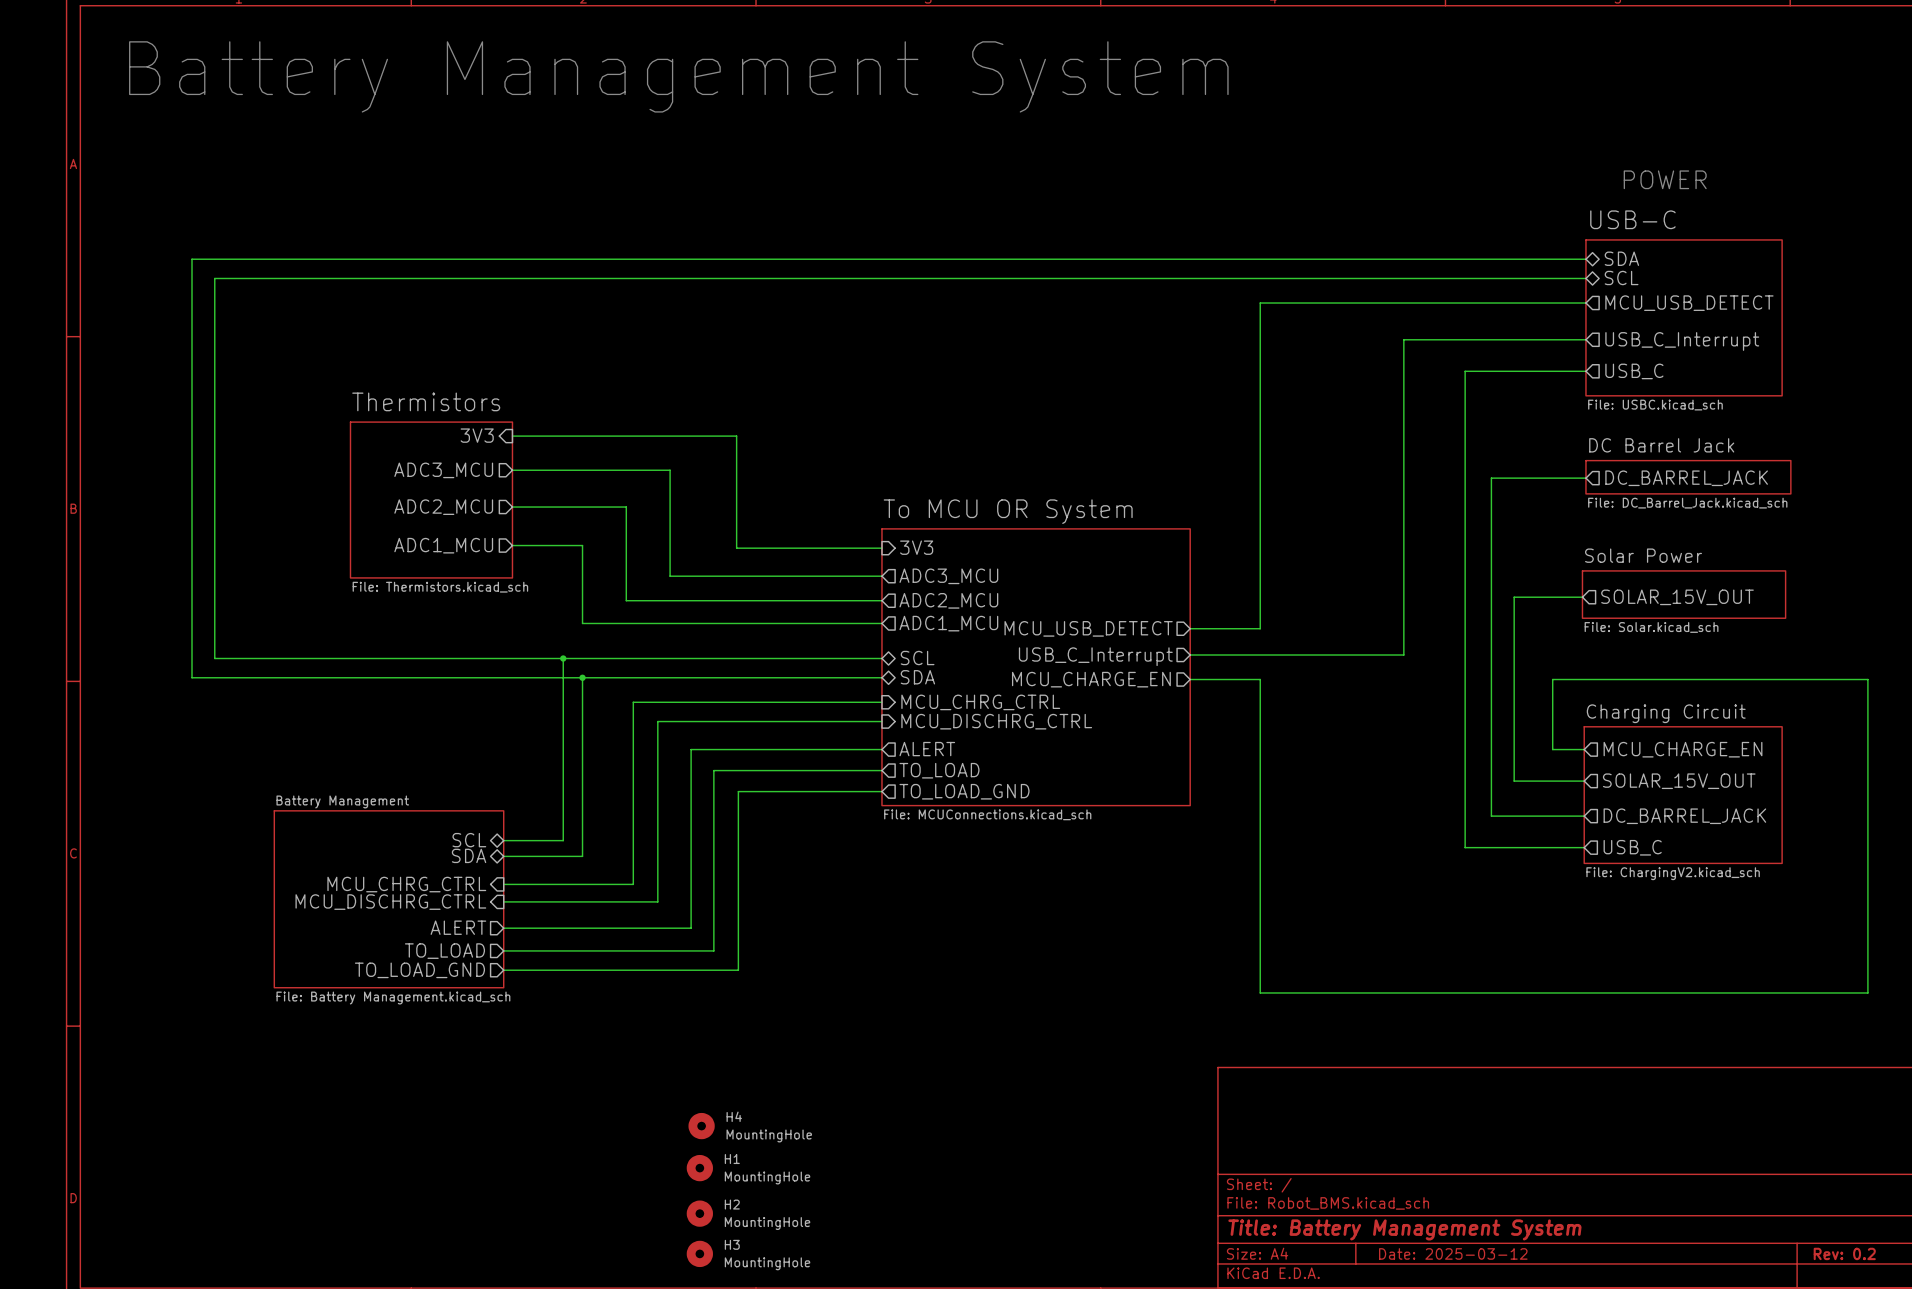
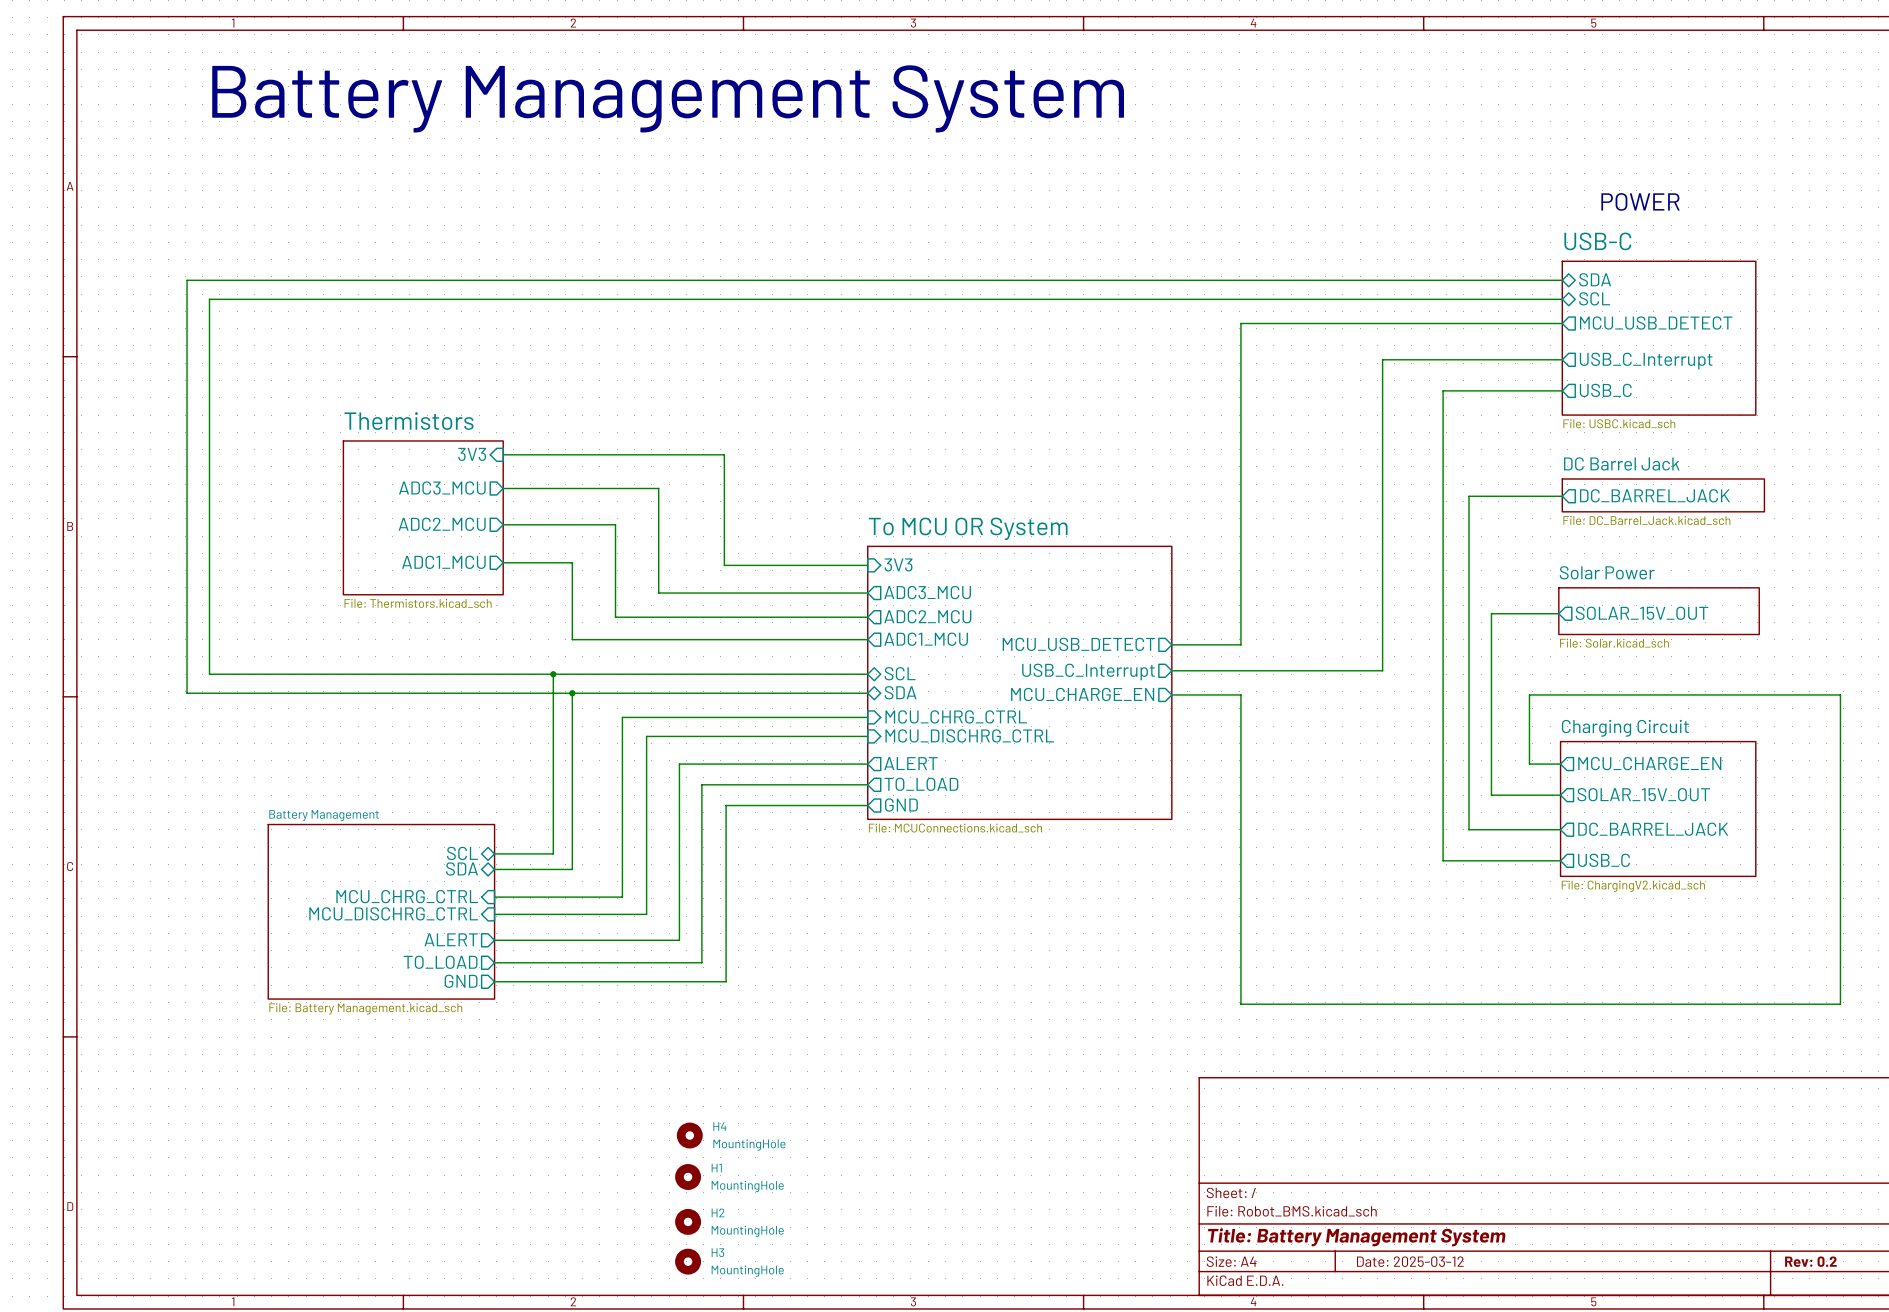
sheet pin: TO_LOAD_GND (964, 791) -> GND (901, 805)
sheet pin: TO_LOAD_GND (419, 970) -> GND (461, 981)

